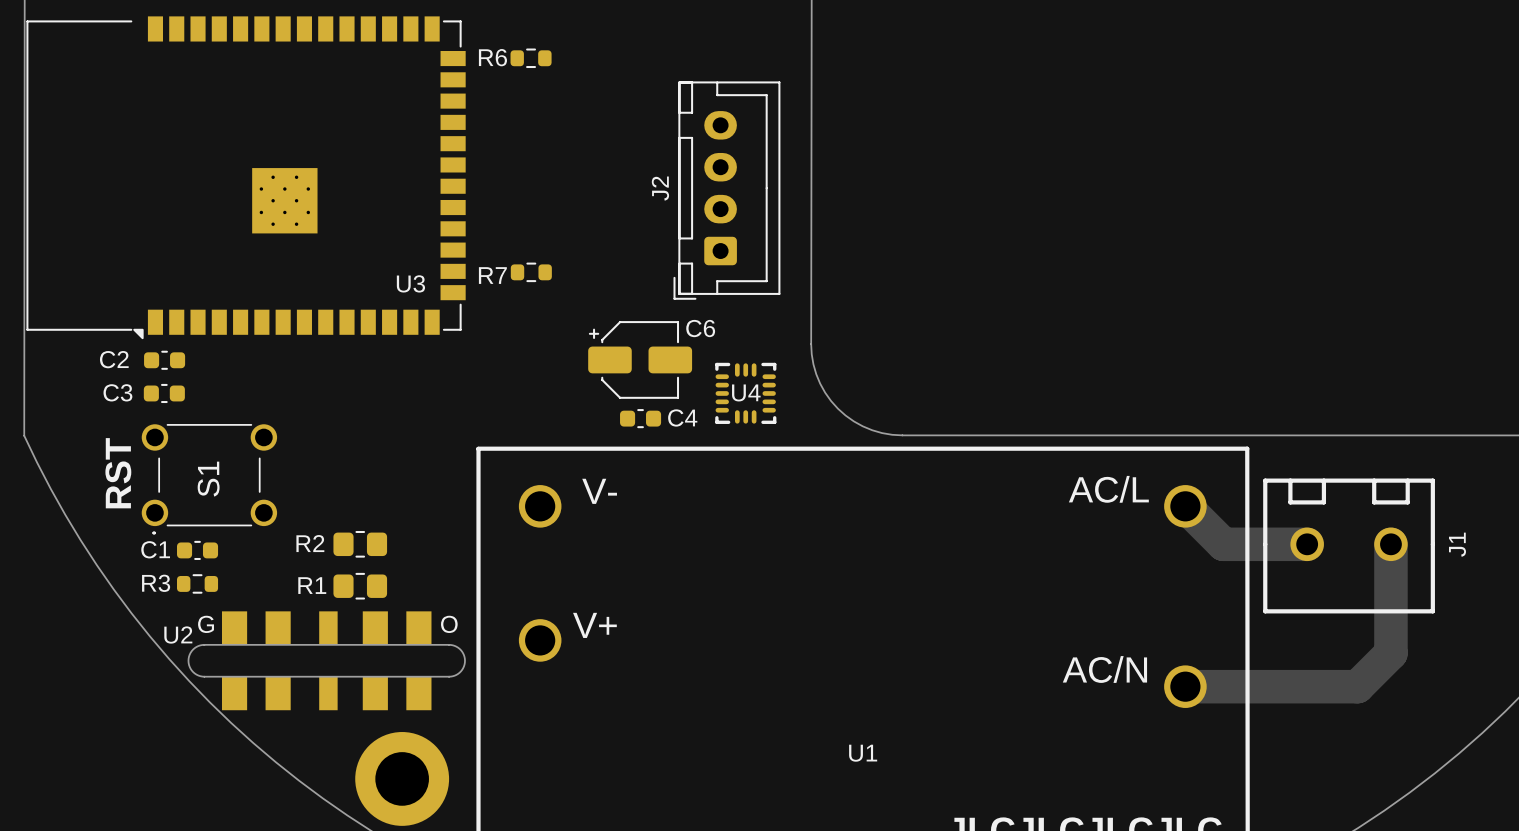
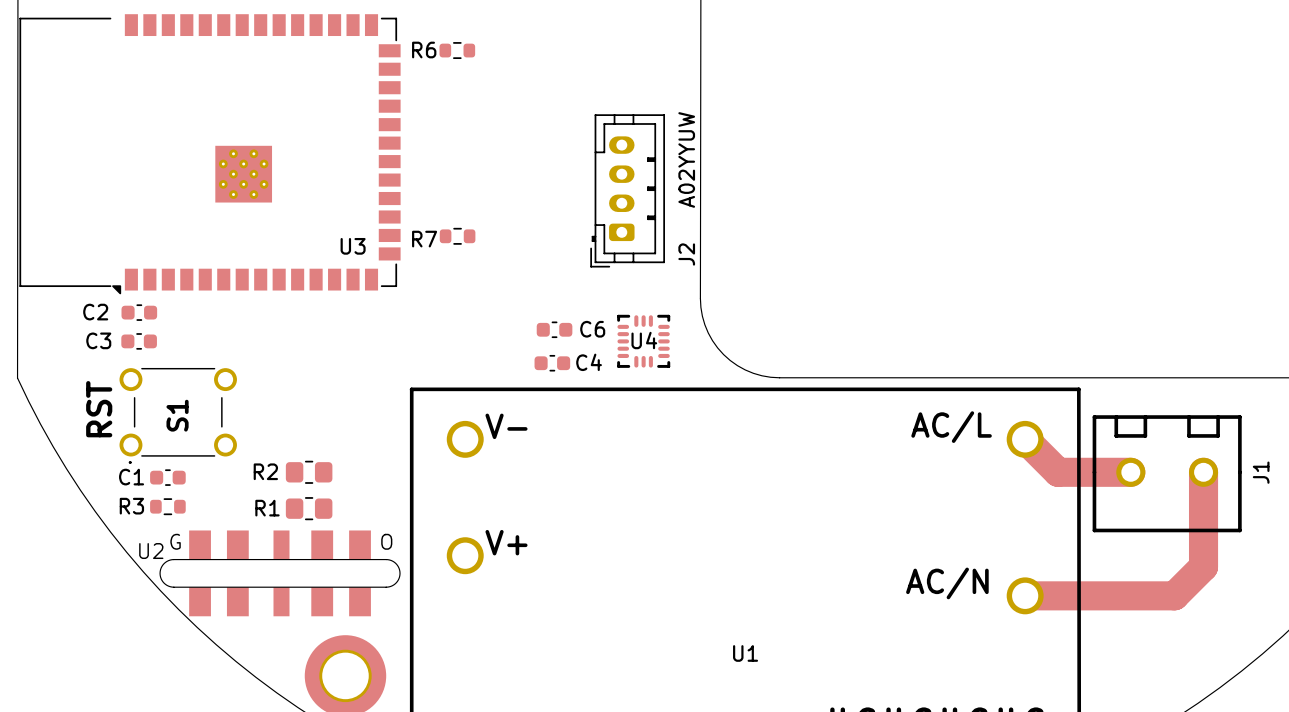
J2 footprint: [673, 81, 781, 300] -> [590, 114, 665, 268]
J2 value: none -> A02YYUW (686, 159)
J2 name position: J2 (660, 188) -> J2 (686, 254)
C6 footprint: [588, 321, 693, 399] -> [536, 321, 573, 339]
C6 name position: C6 (700, 328) -> C6 (592, 329)

